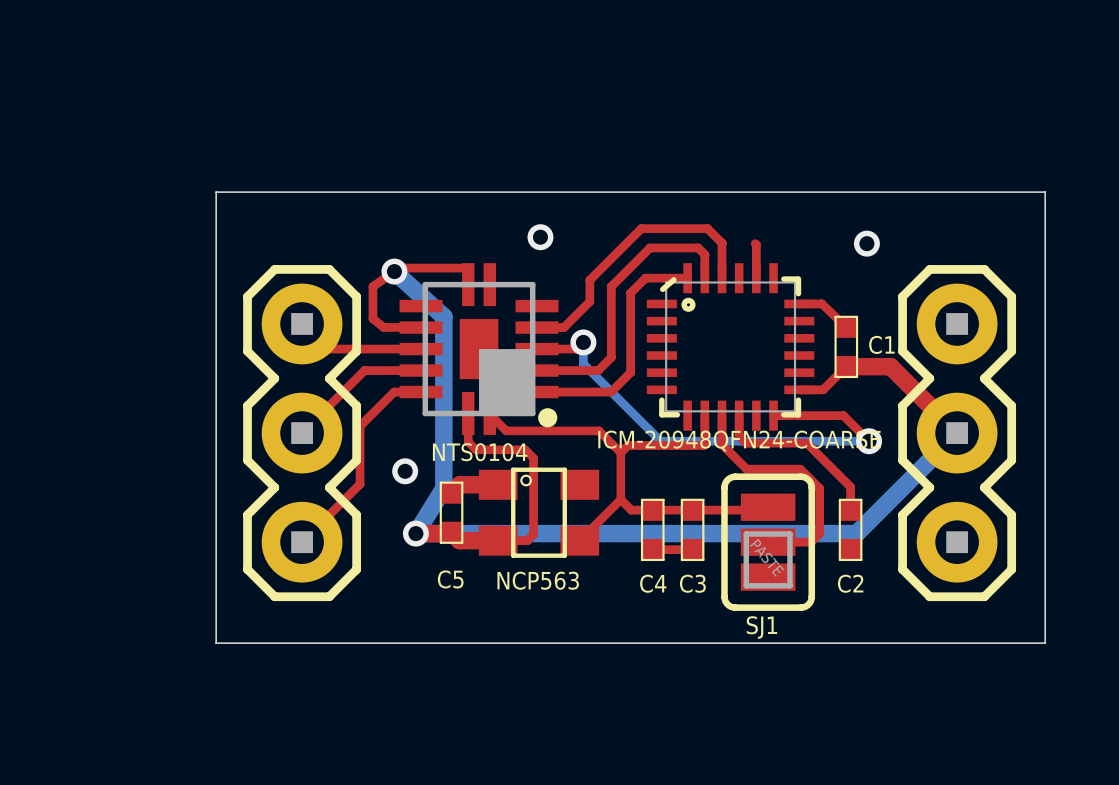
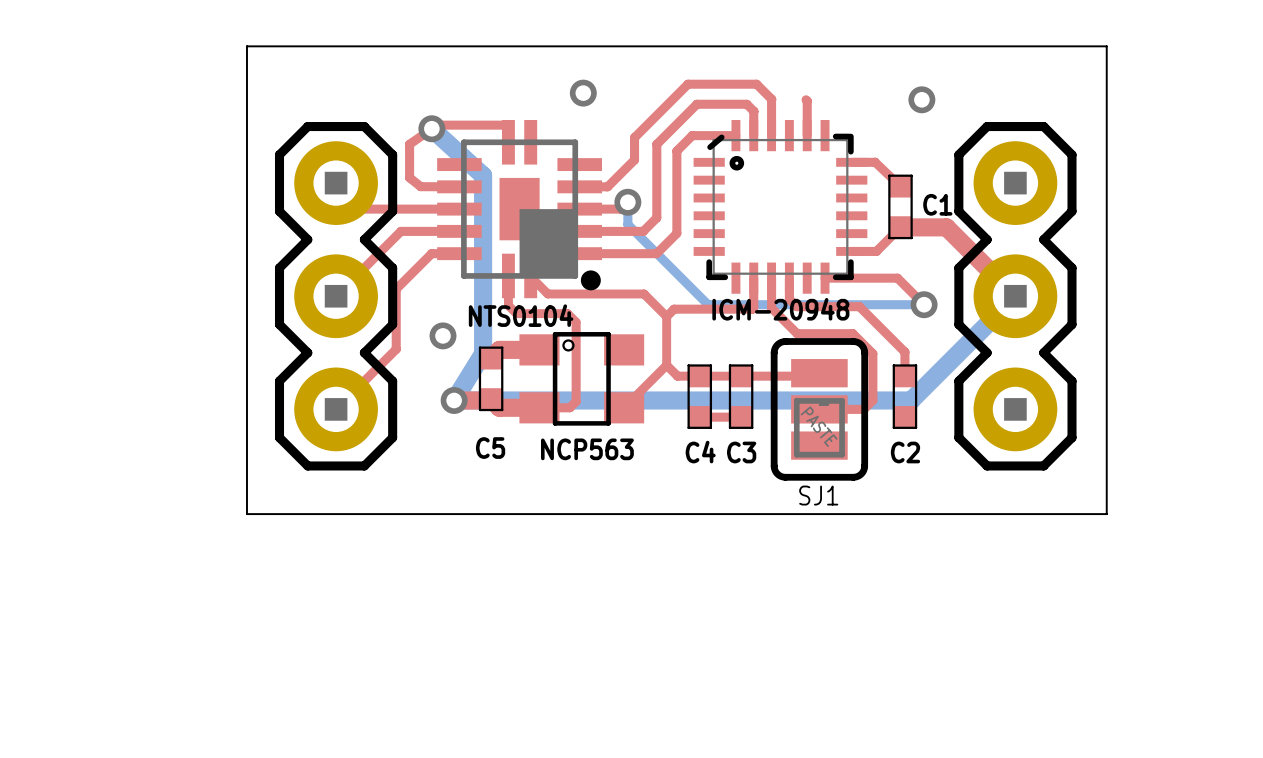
part value: ICM-20948QFN24-COARSE (739, 441) -> ICM-20948 (780, 309)

